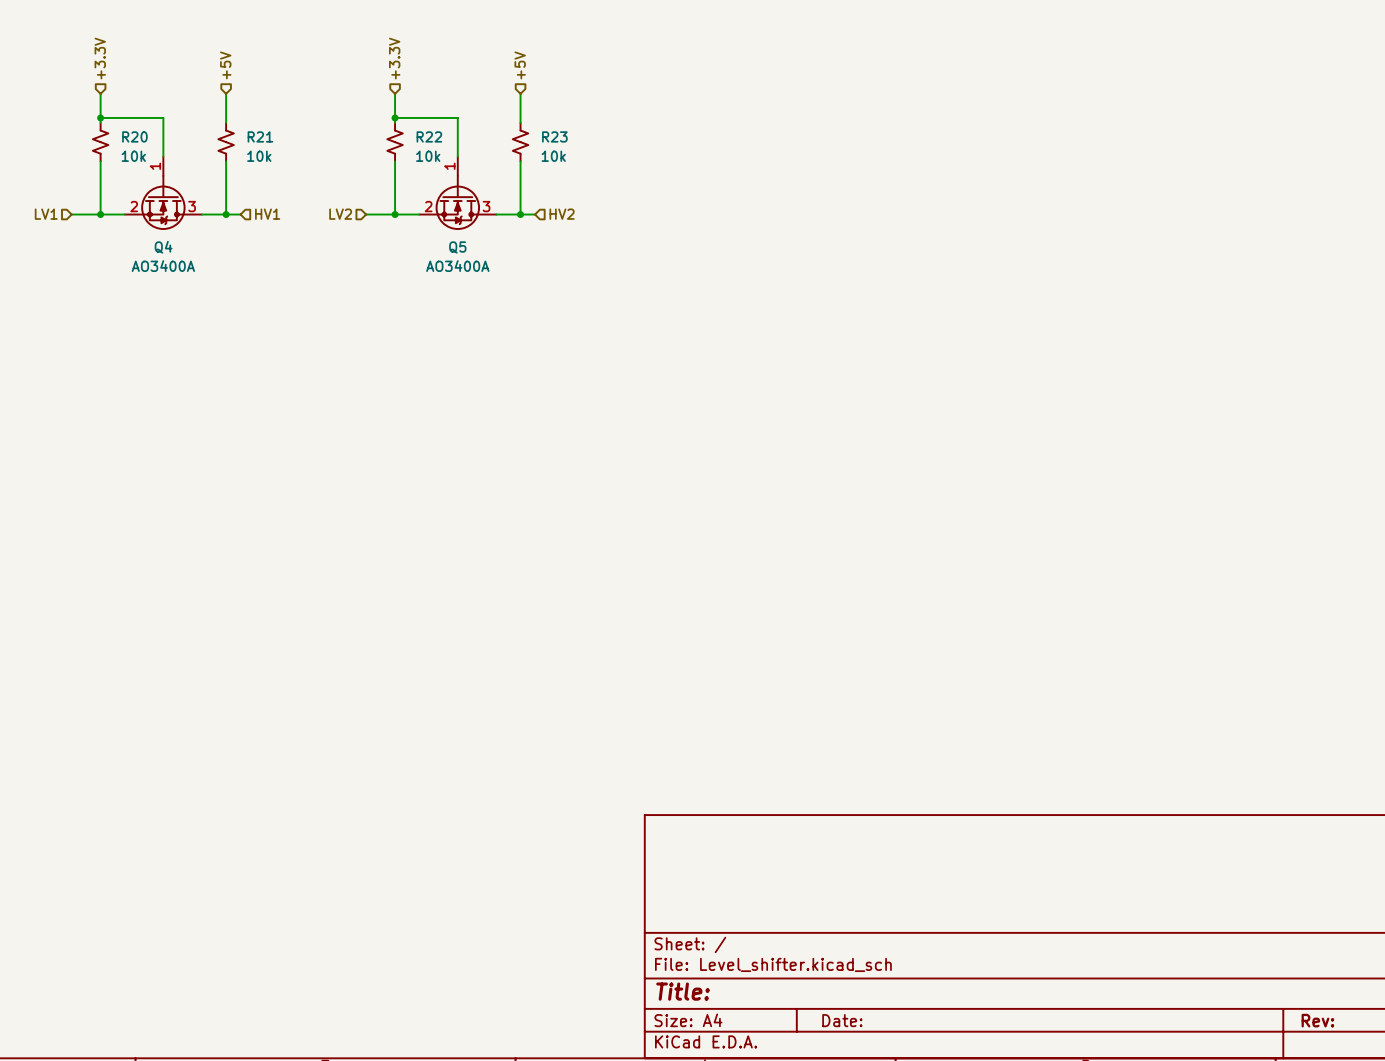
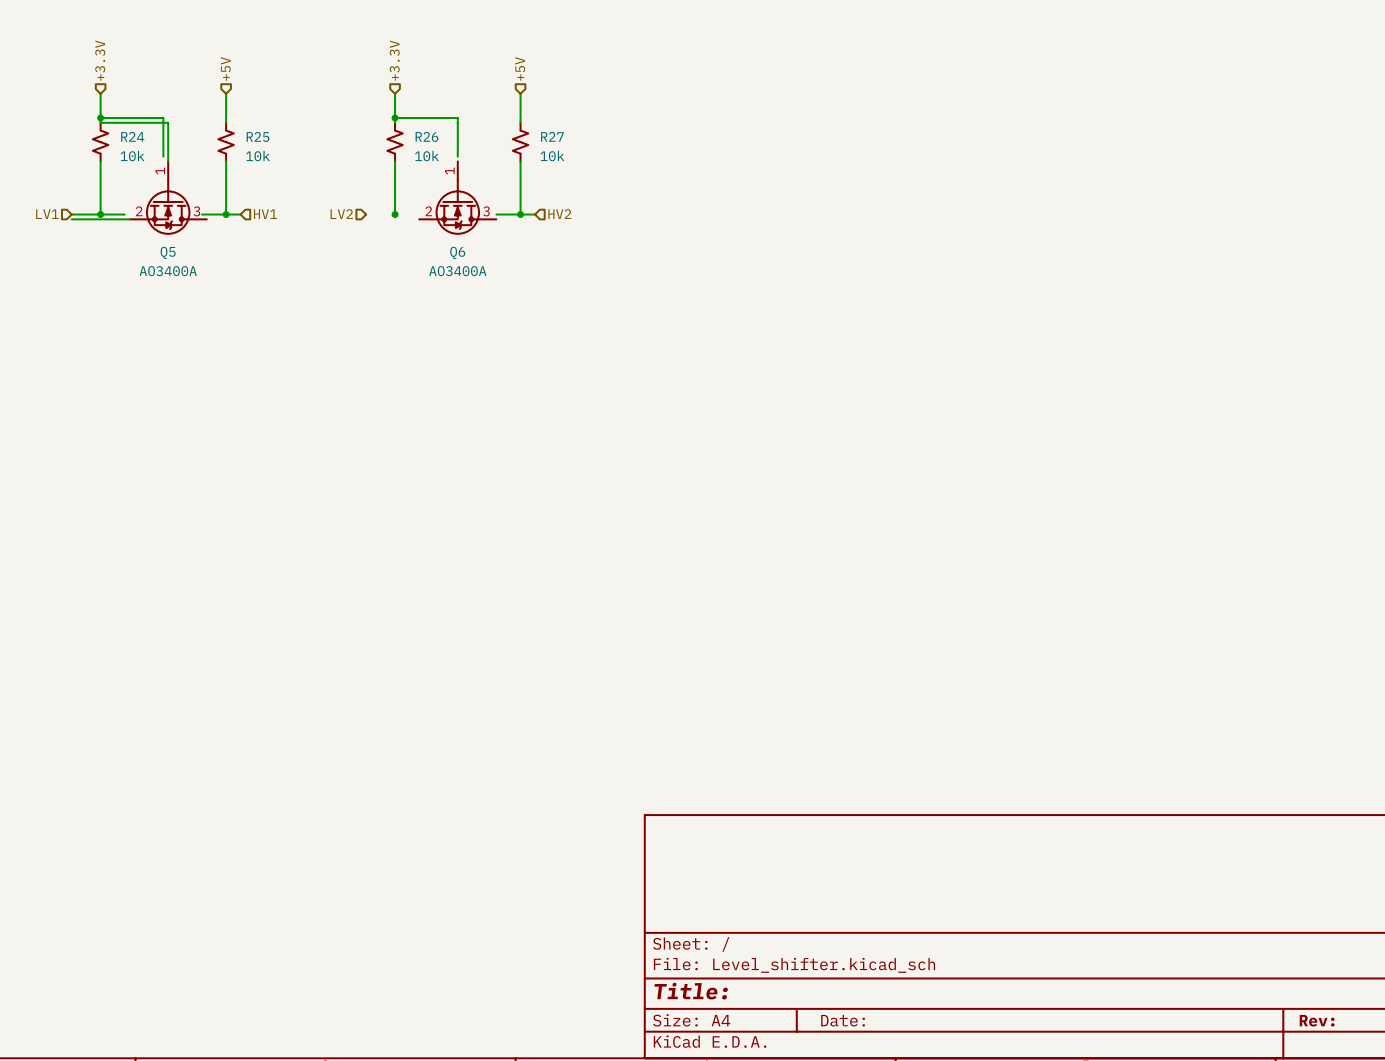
wire: none -> (100, 122) (168, 122) (168, 161)
R20 name: R20 (134, 136) -> R24 (132, 136)
R21 name: R21 (260, 136) -> R25 (258, 136)
R22 name: R22 (429, 136) -> R26 (426, 136)
R23 name: R23 (554, 136) -> R27 (552, 136)
Q4: AO3400A (163, 193) -> none
Q5 position: (457, 193) -> (168, 198)
Q6: none -> AO3400A (457, 198)
wire: (366, 214) (419, 214) -> none
wire: none -> (71, 219) (129, 219)

